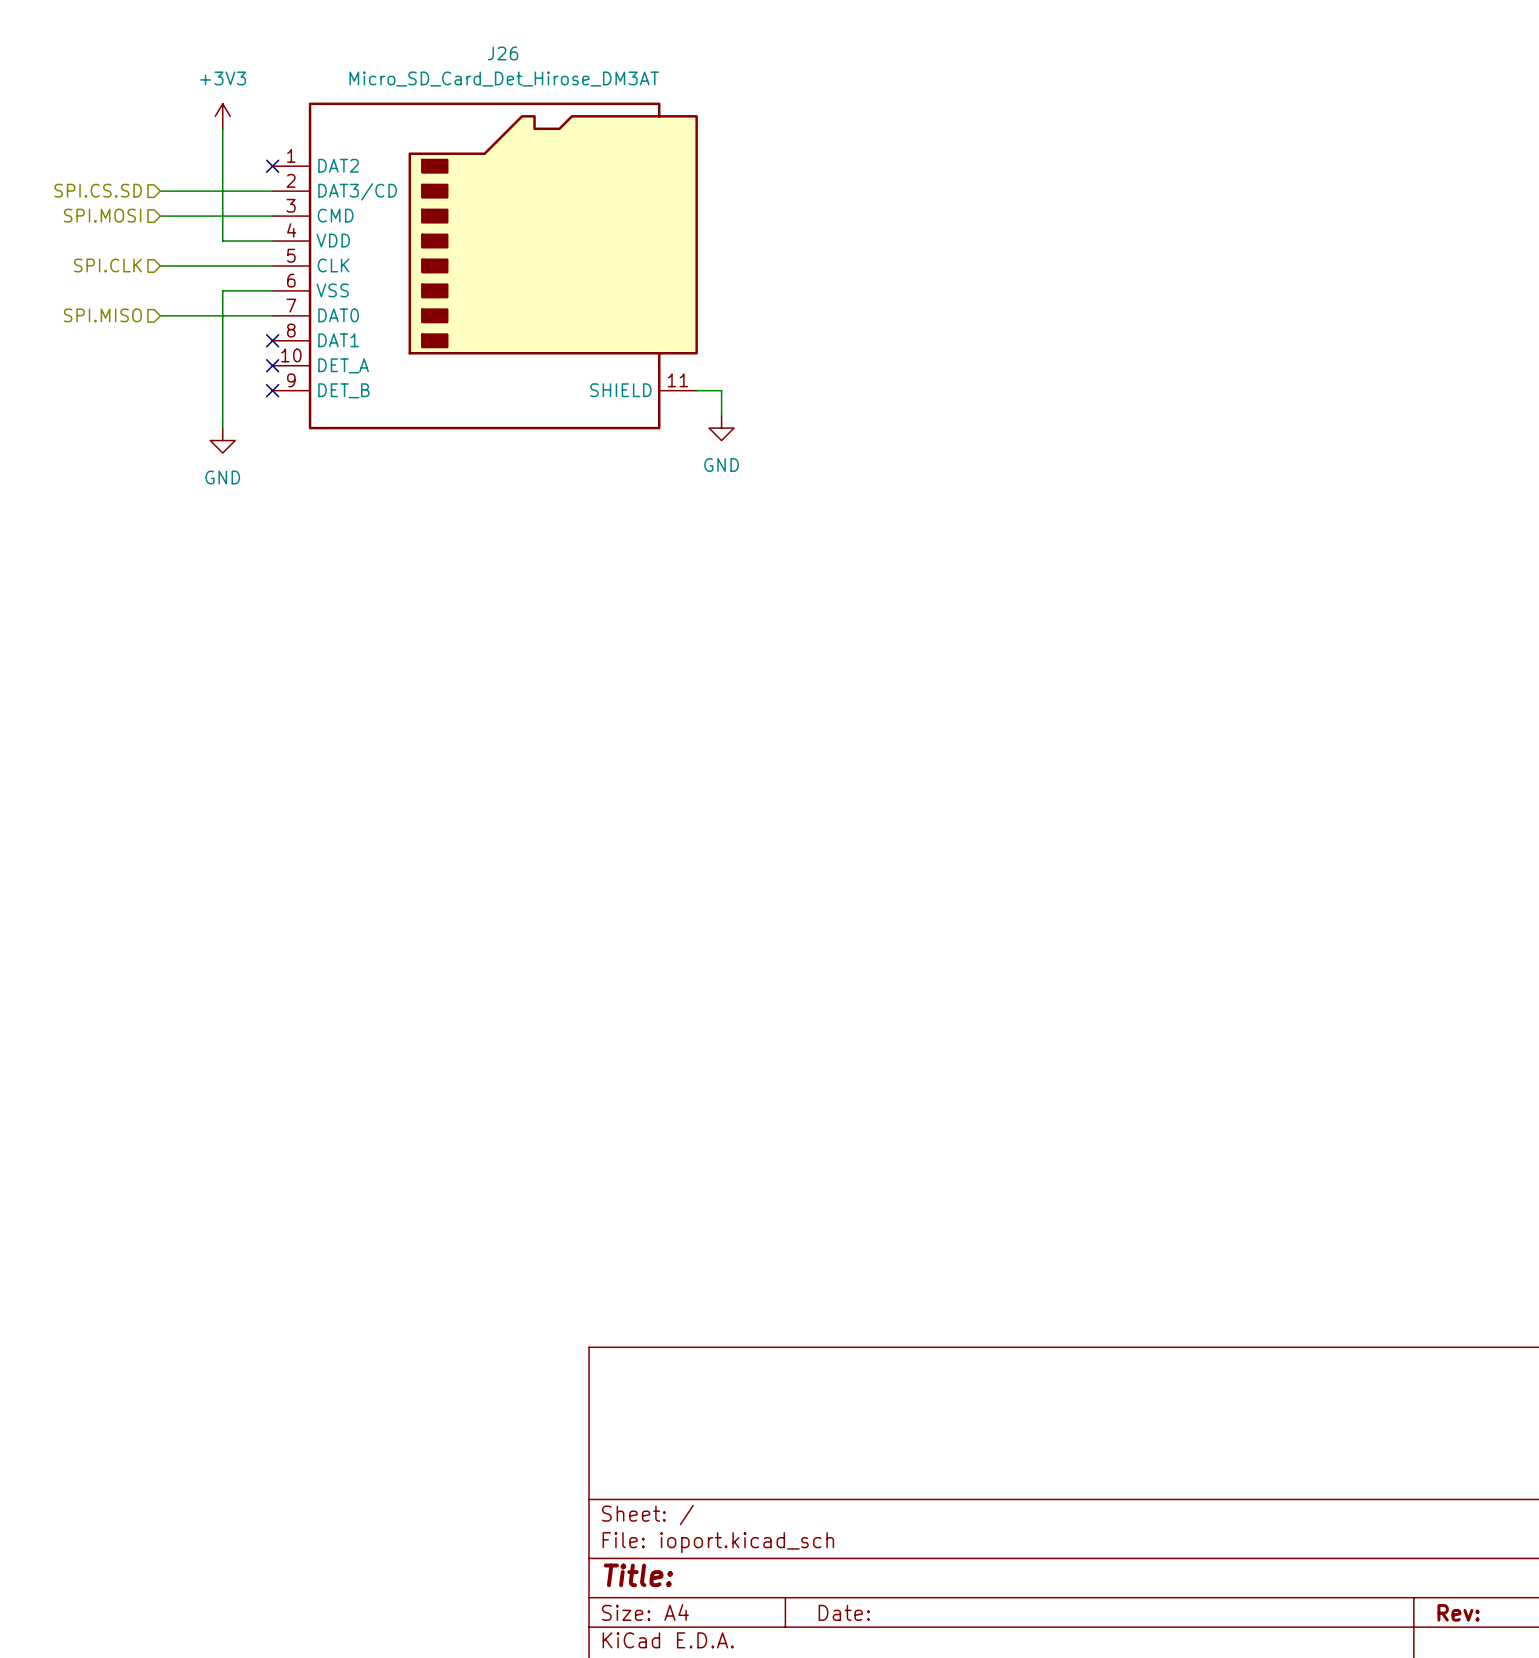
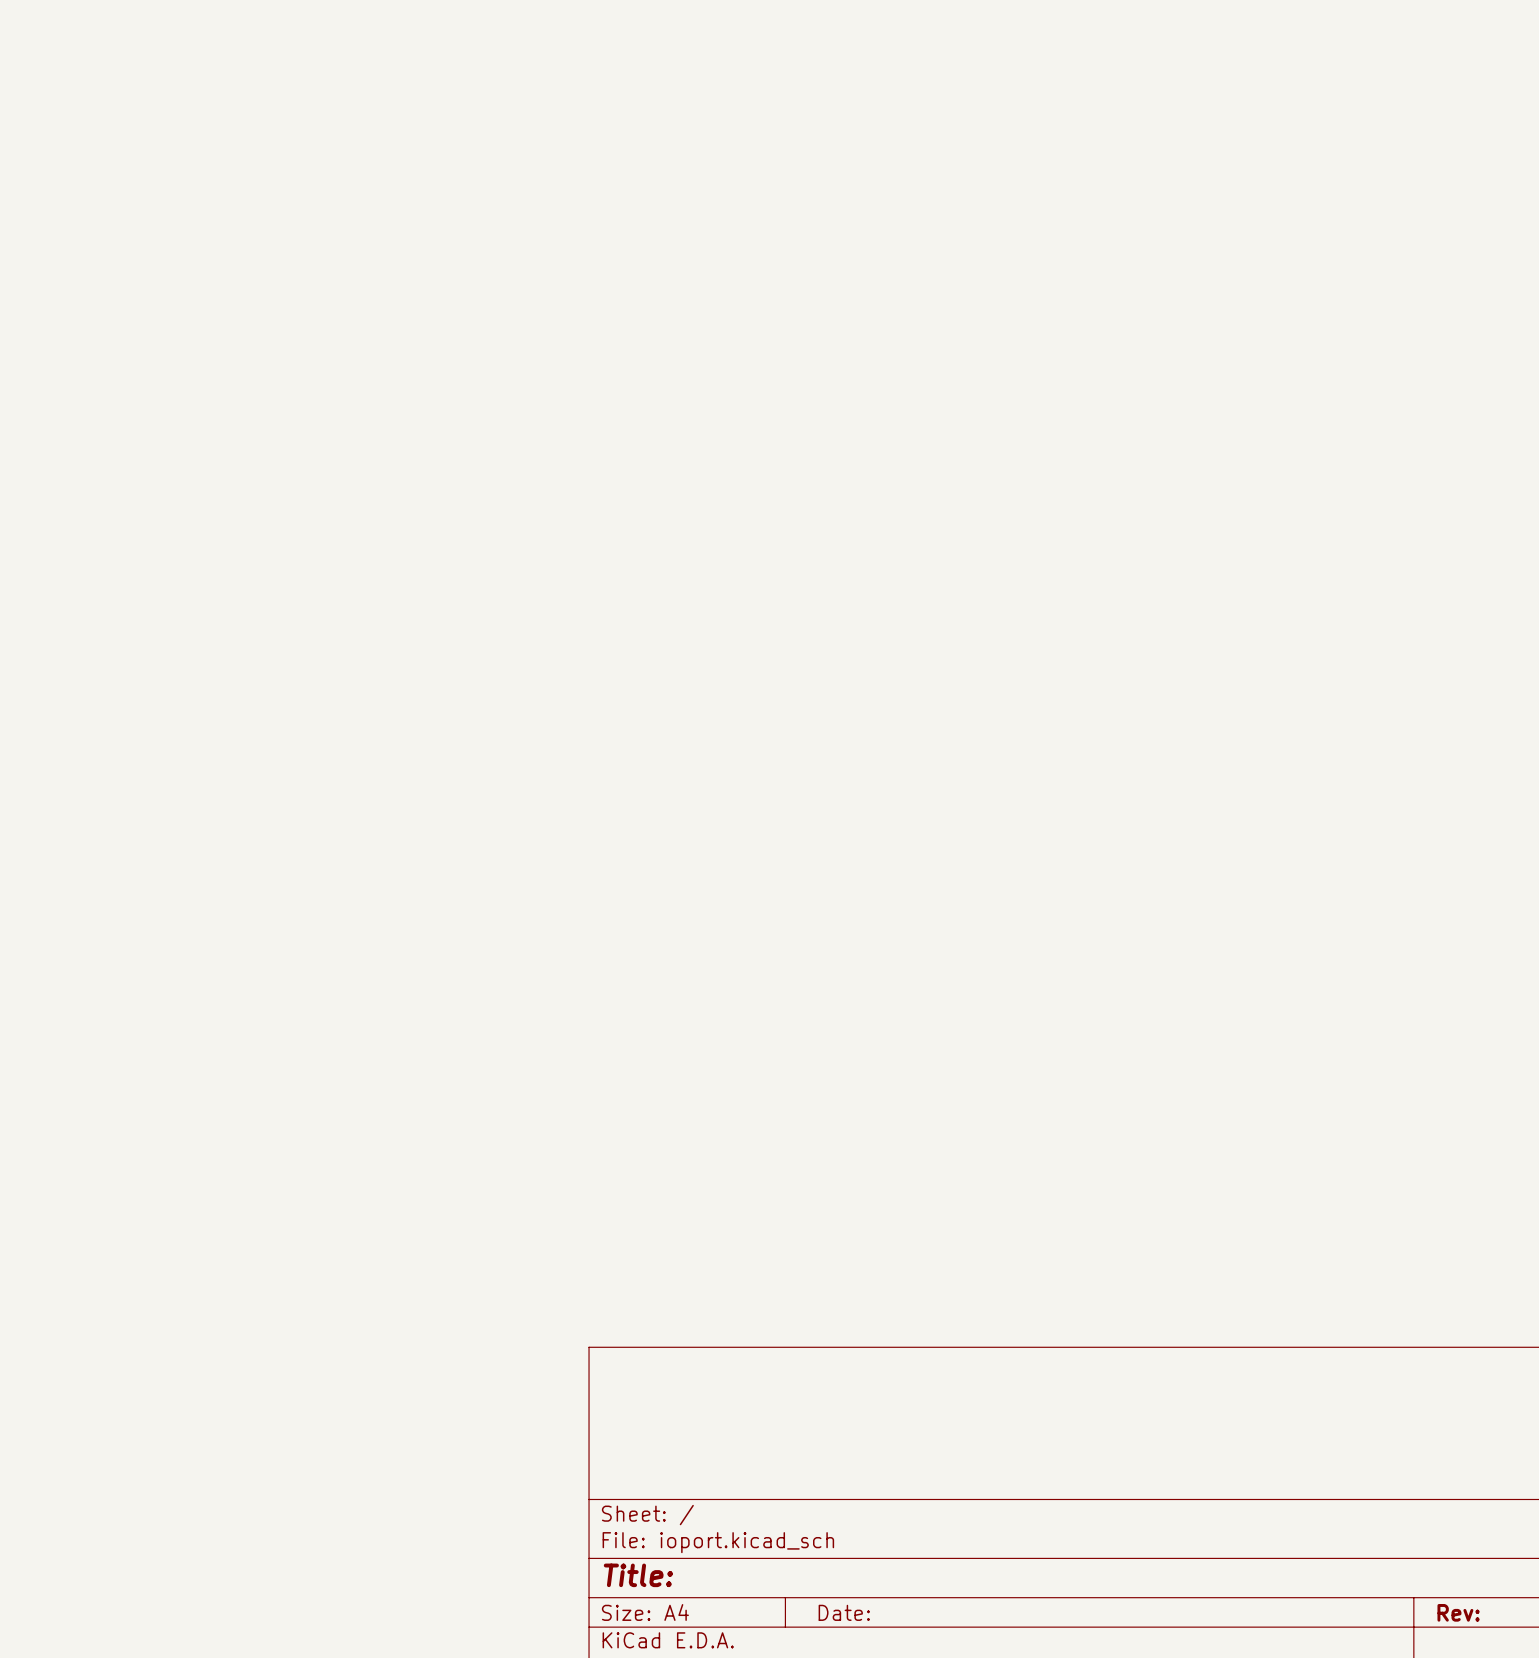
power symbol: +3V3 (222, 116) -> none
wire: (222, 128) (222, 241) (272, 241) -> none
no-connect mark: (272, 166) -> none
hierarchical label: SPI.CS.SD (98, 190) -> none
wire: (160, 191) (272, 191) -> none
hierarchical label: SPI.MOSI (102, 215) -> none
wire: (160, 216) (272, 216) -> none
hierarchical label: SPI.CLK (107, 265) -> none
wire: (160, 265) (272, 265) -> none
J26: Micro_SD_Card_Det_Hirose_DM3AT (485, 265) -> none
wire: (272, 290) (222, 290) (222, 428) -> none
hierarchical label: SPI.MISO (102, 315) -> none
wire: (160, 315) (272, 315) -> none
no-connect mark: (272, 340) -> none
no-connect mark: (272, 365) -> none
no-connect mark: (272, 390) -> none
wire: (696, 390) (721, 390) (721, 415) -> none
power symbol: GND (721, 428) -> none
power symbol: GND (222, 440) -> none

